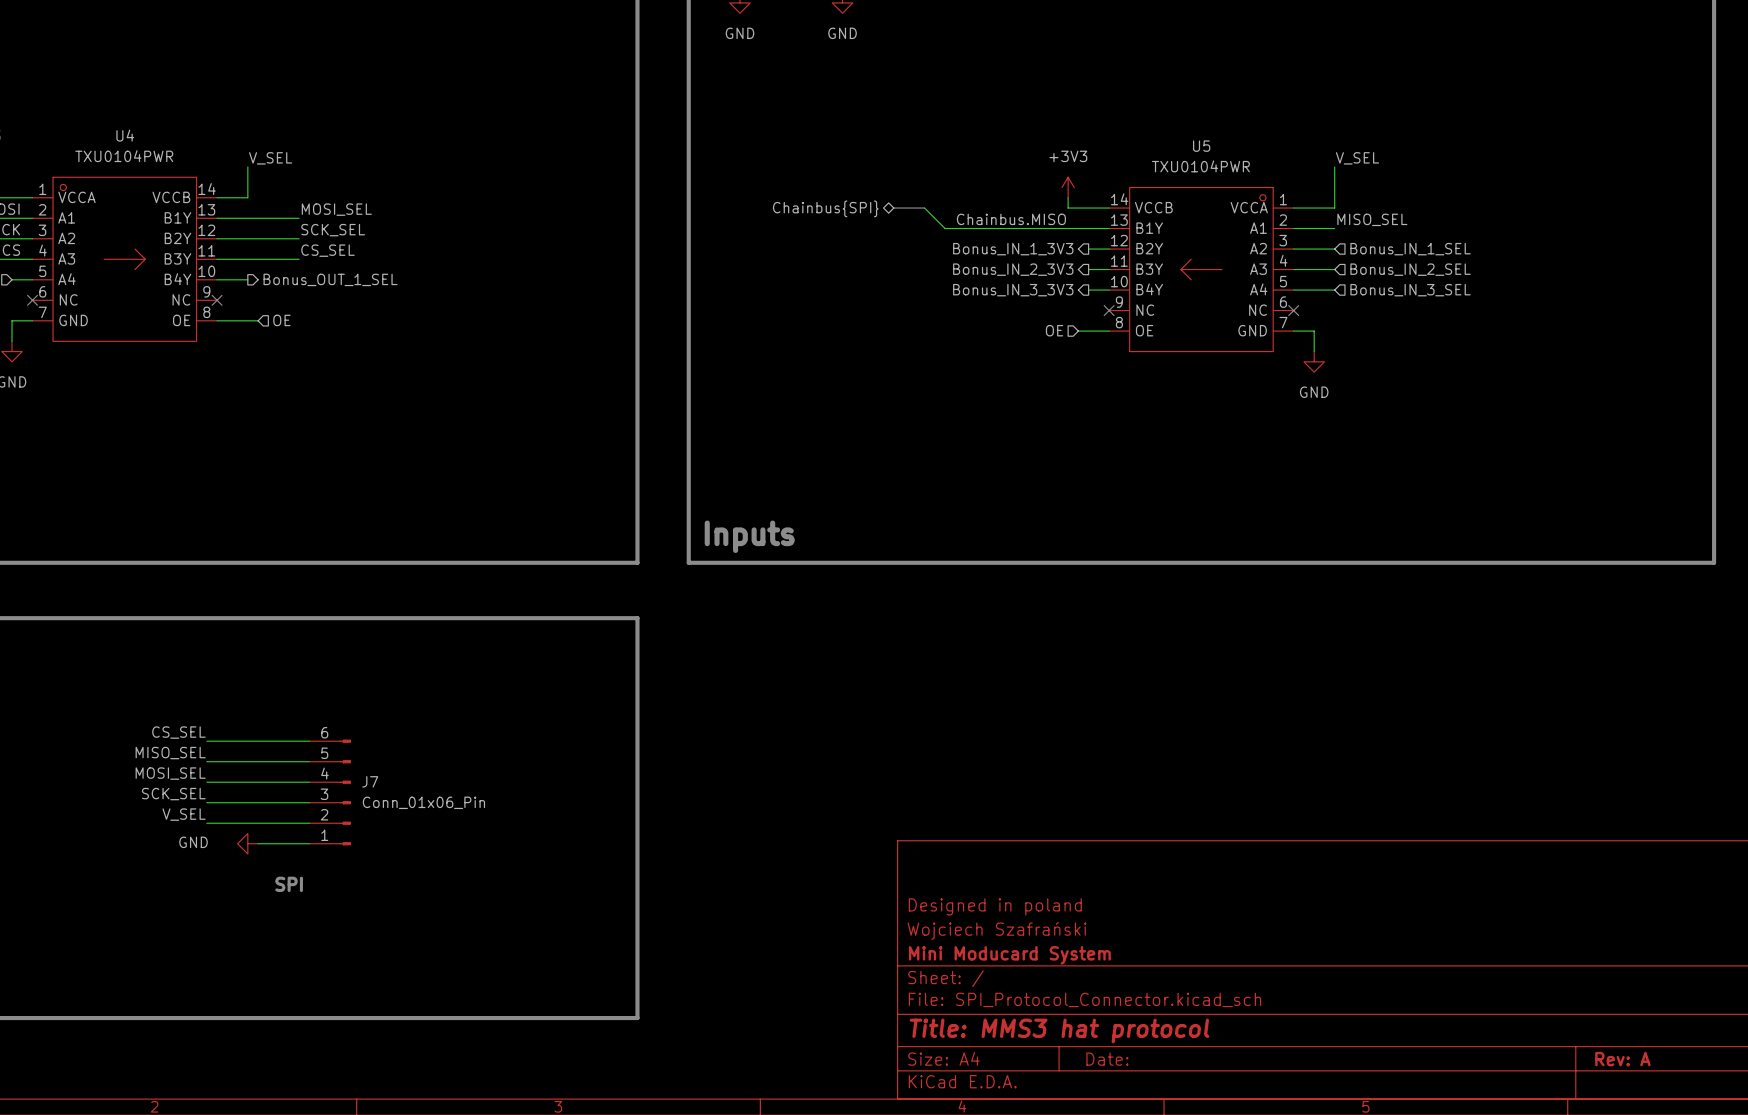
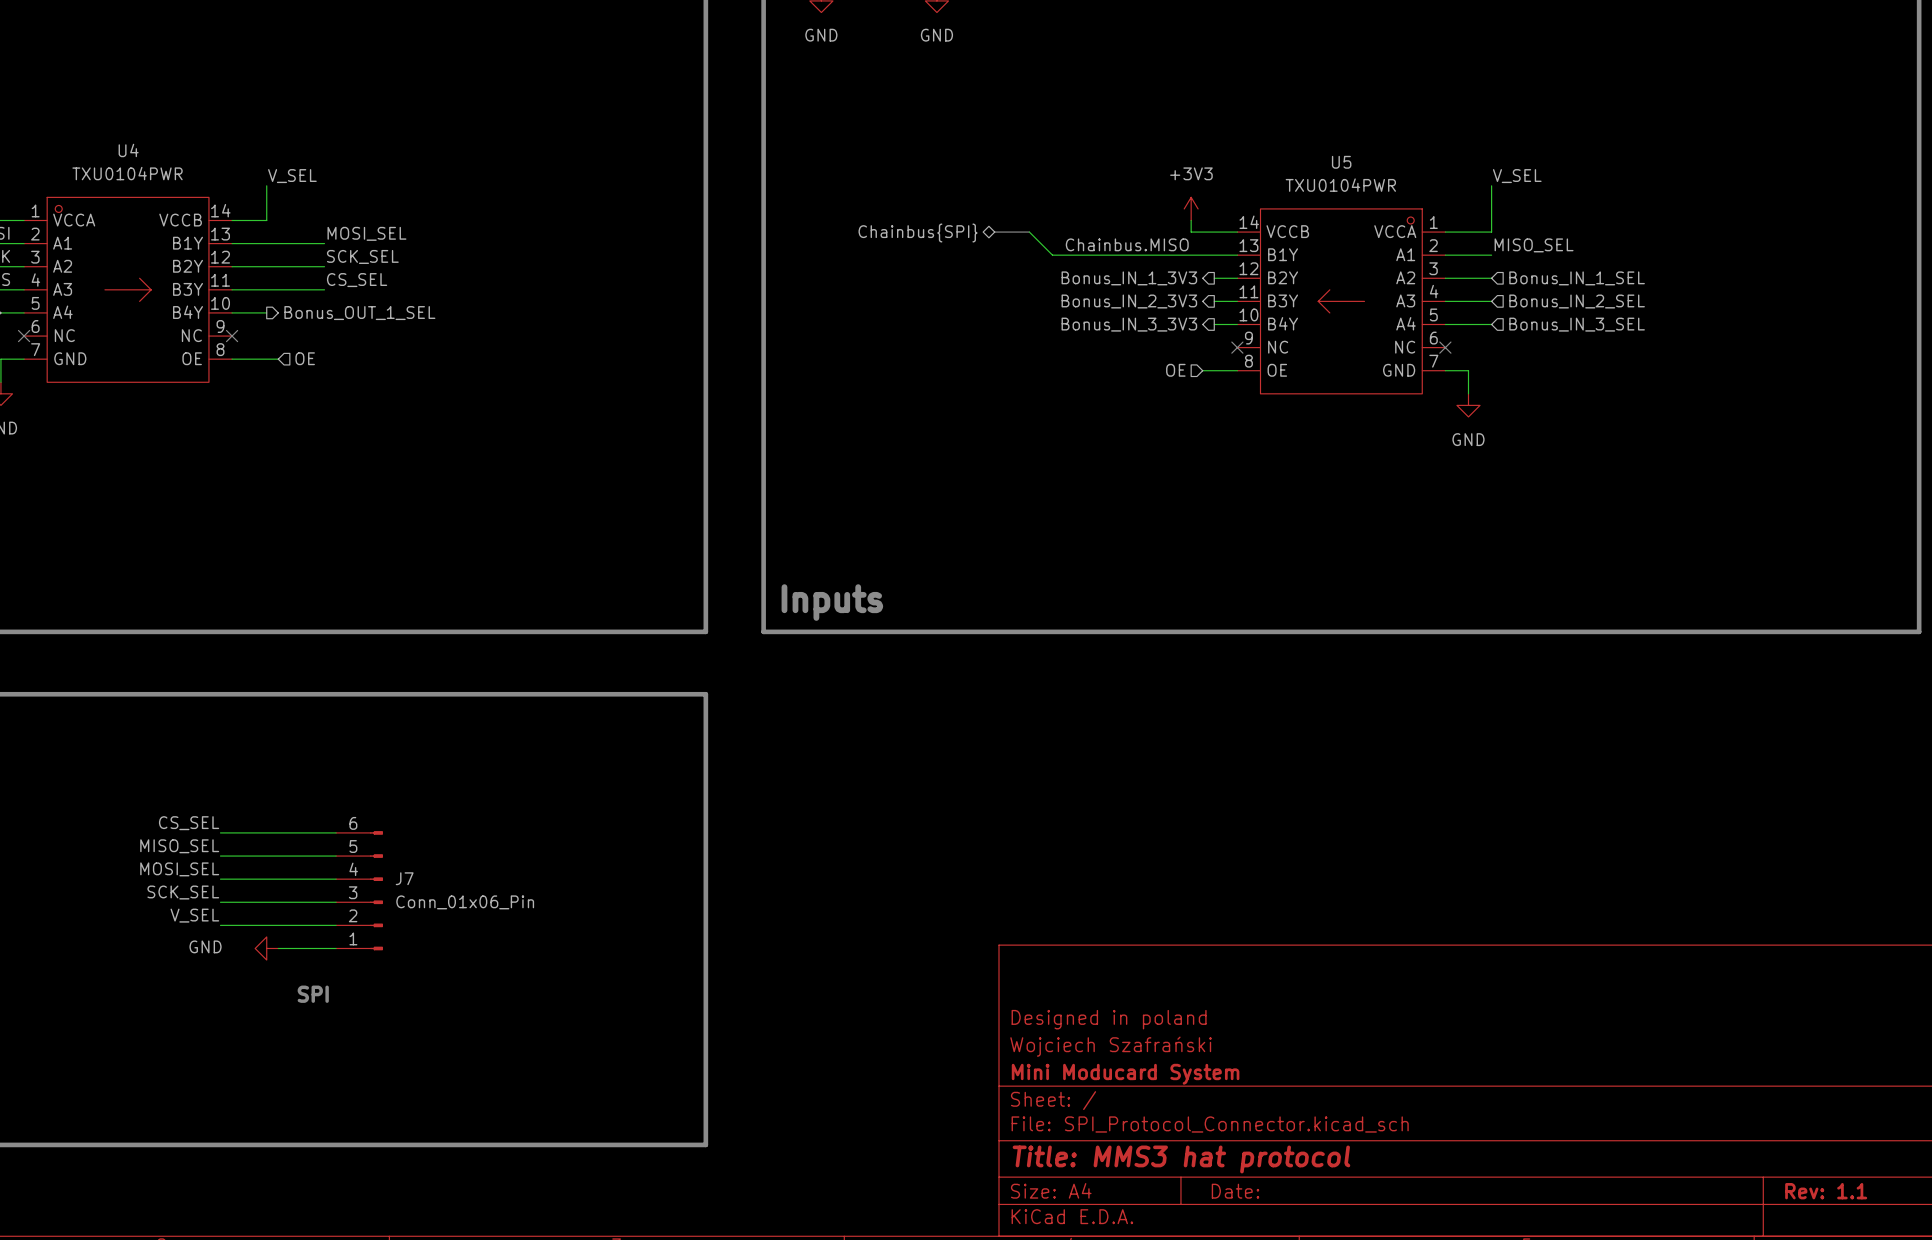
title block: Rev: A (1622, 1059) -> Rev: 1.1 (1826, 1191)

